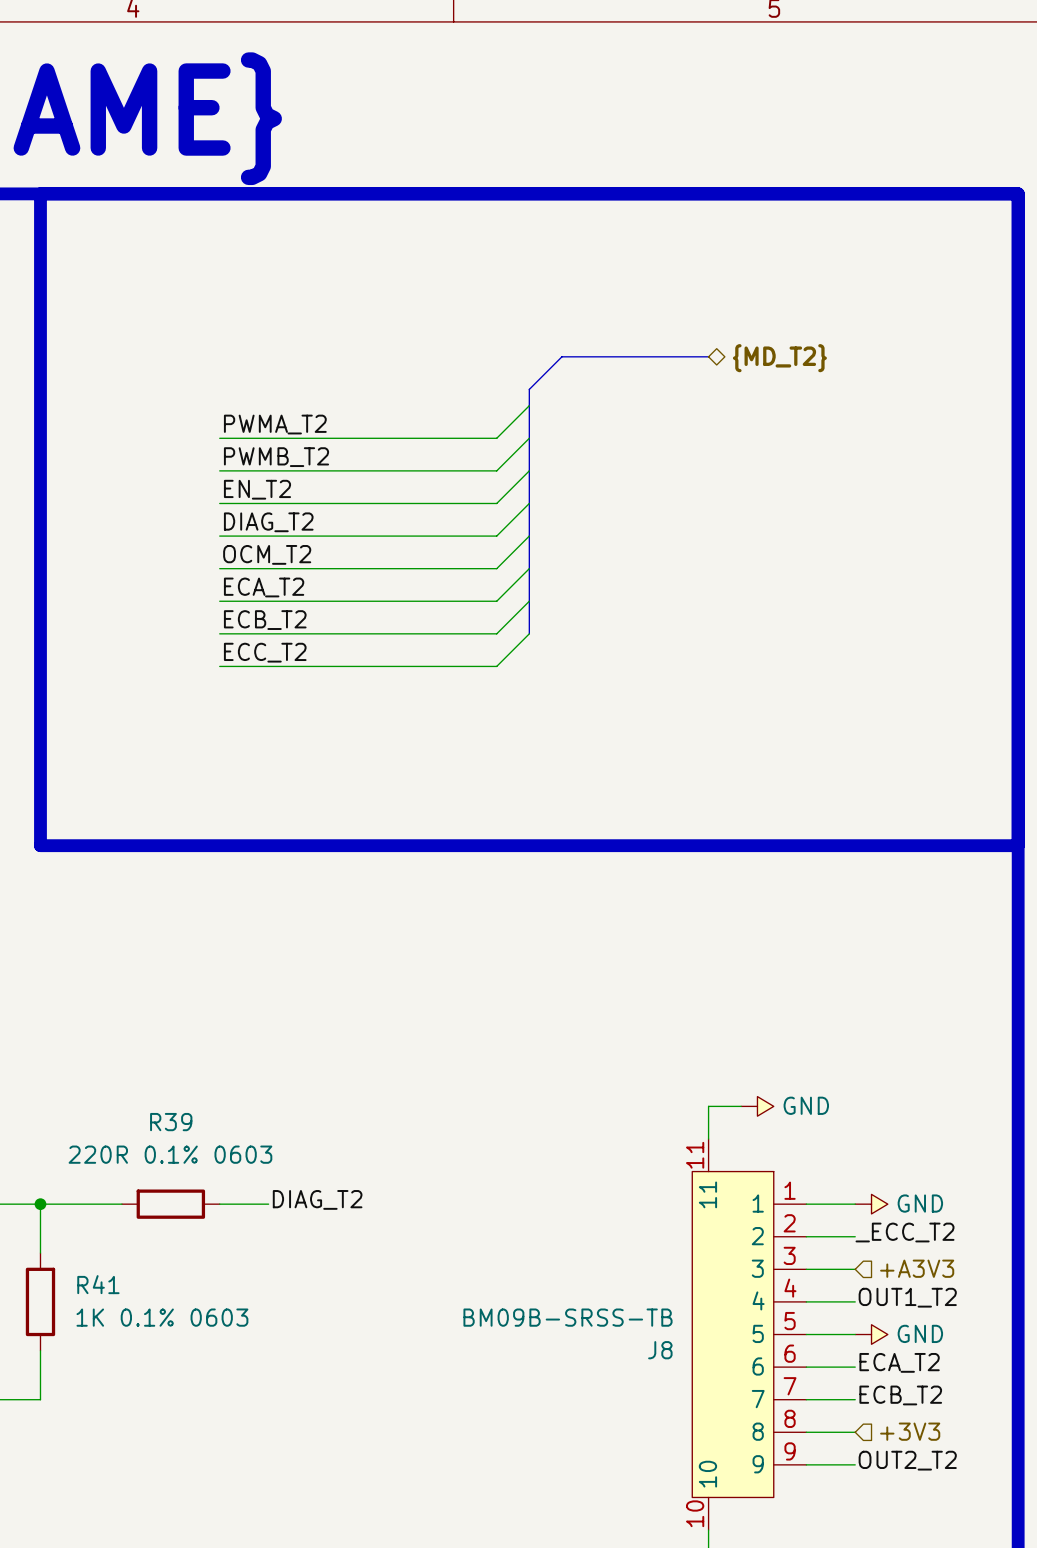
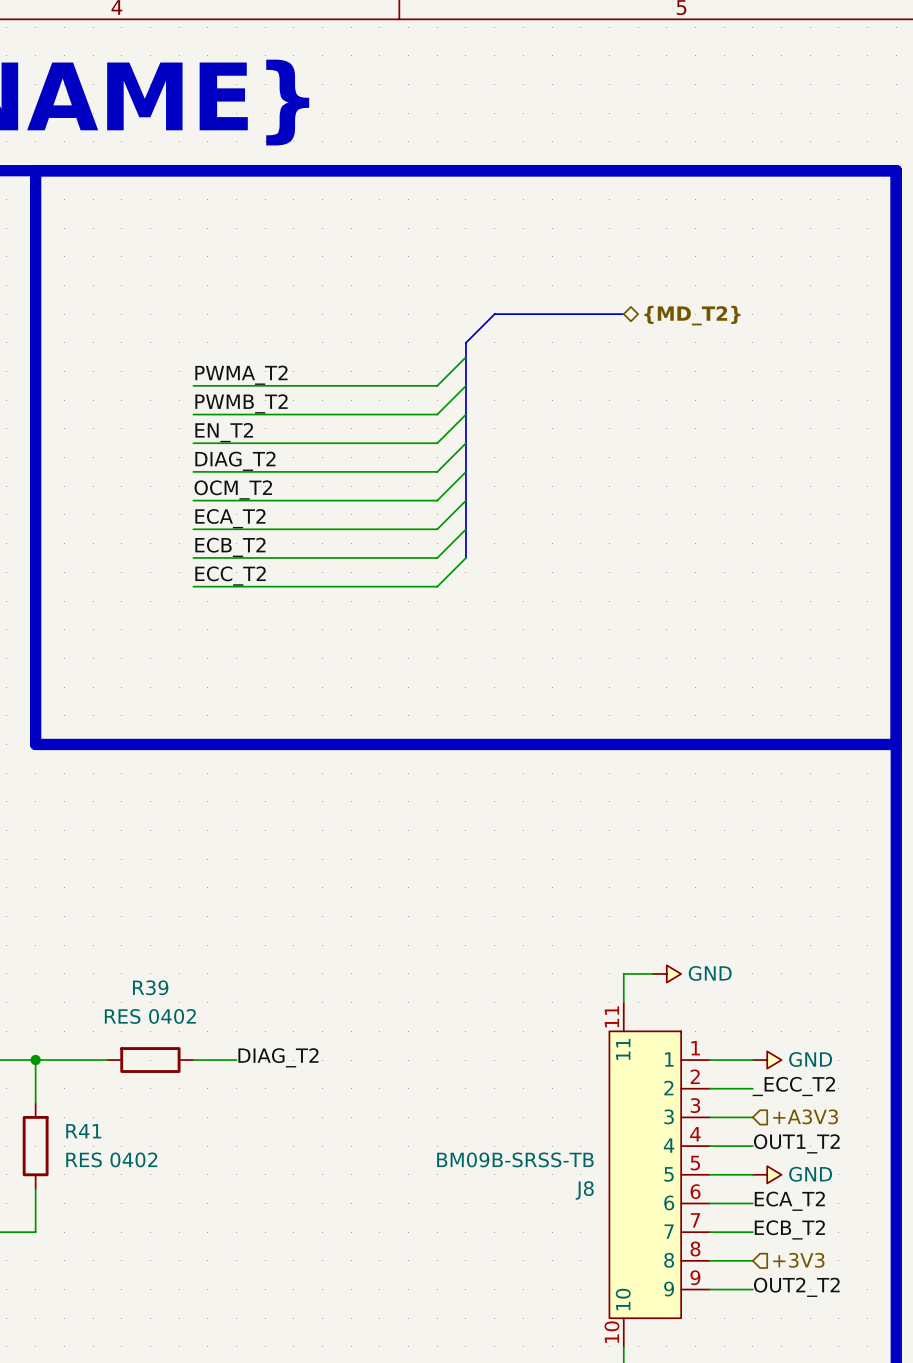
R39 value: 220R 0.1% 0603 (170, 1154) -> RES 0402 (150, 1016)
R41 value: 1K 0.1% 0603 (162, 1317) -> RES 0402 (111, 1159)

